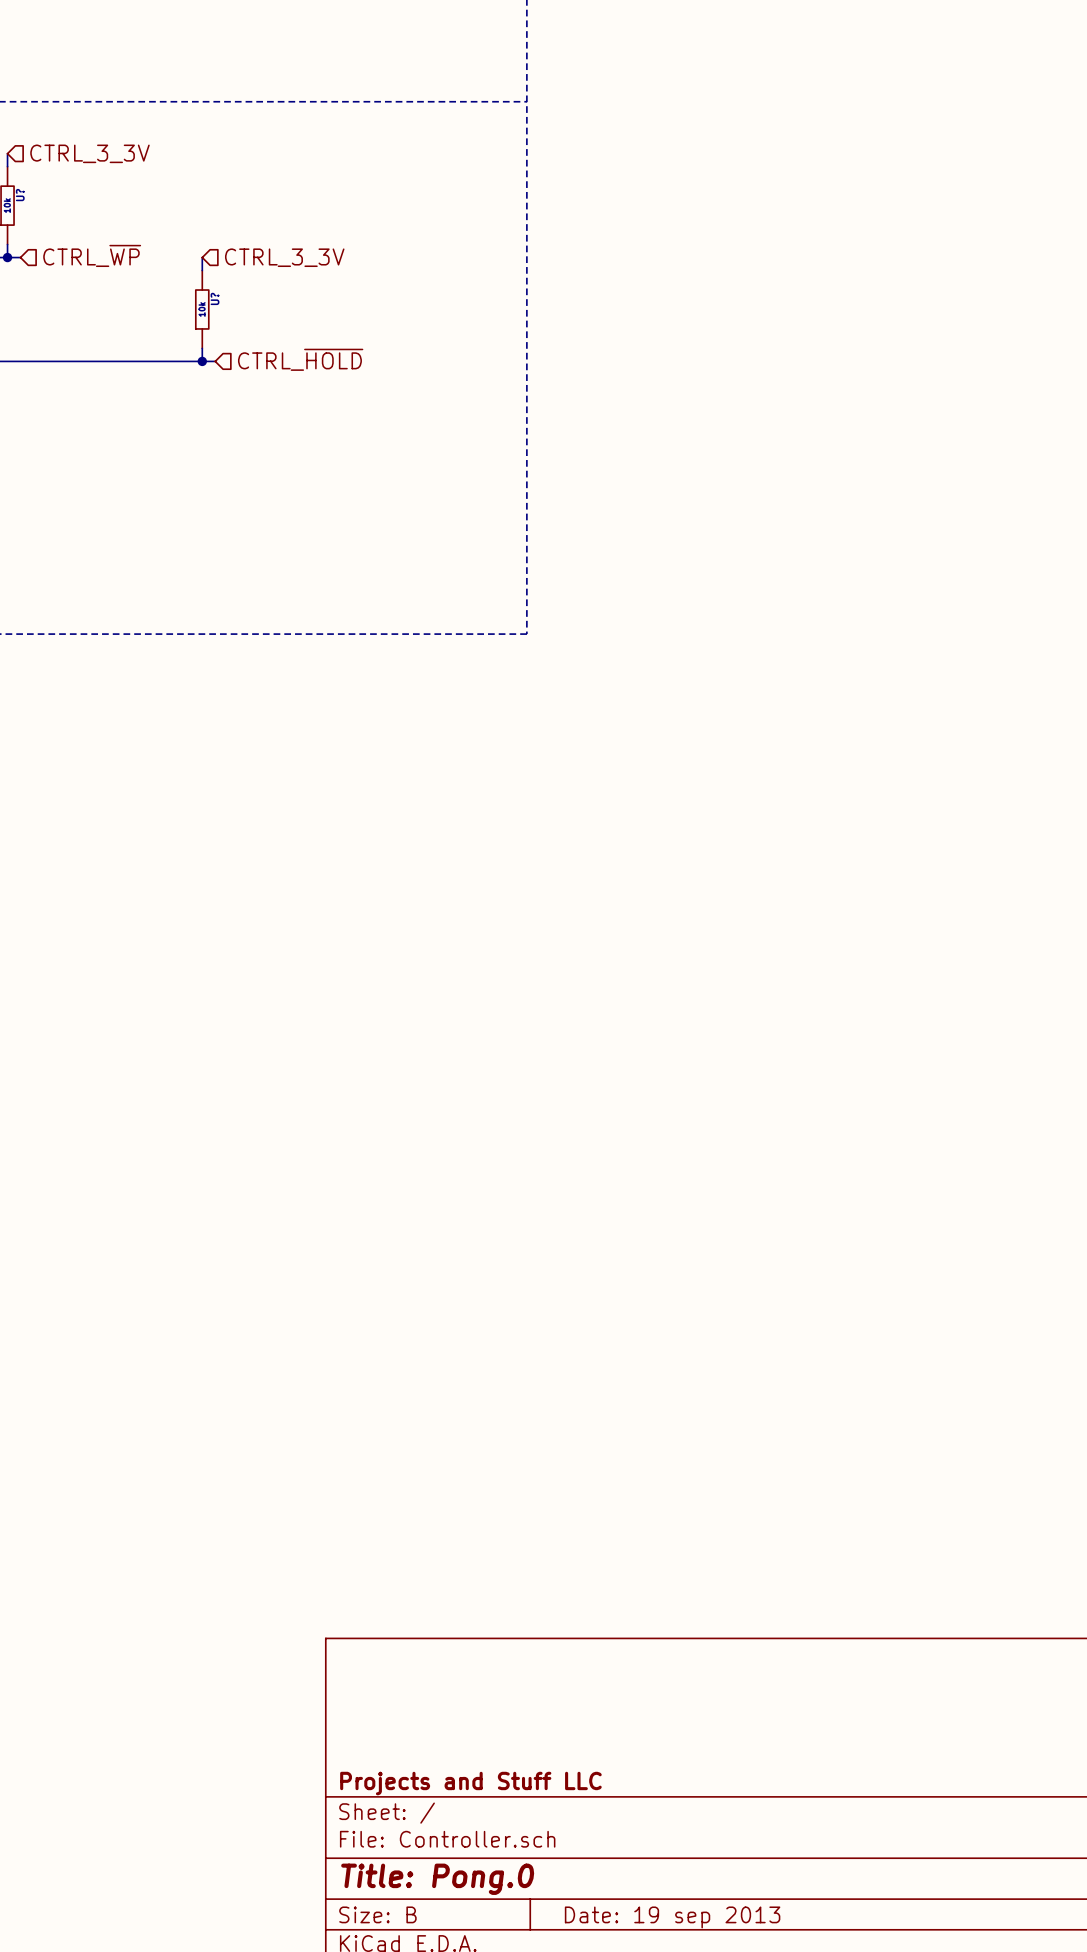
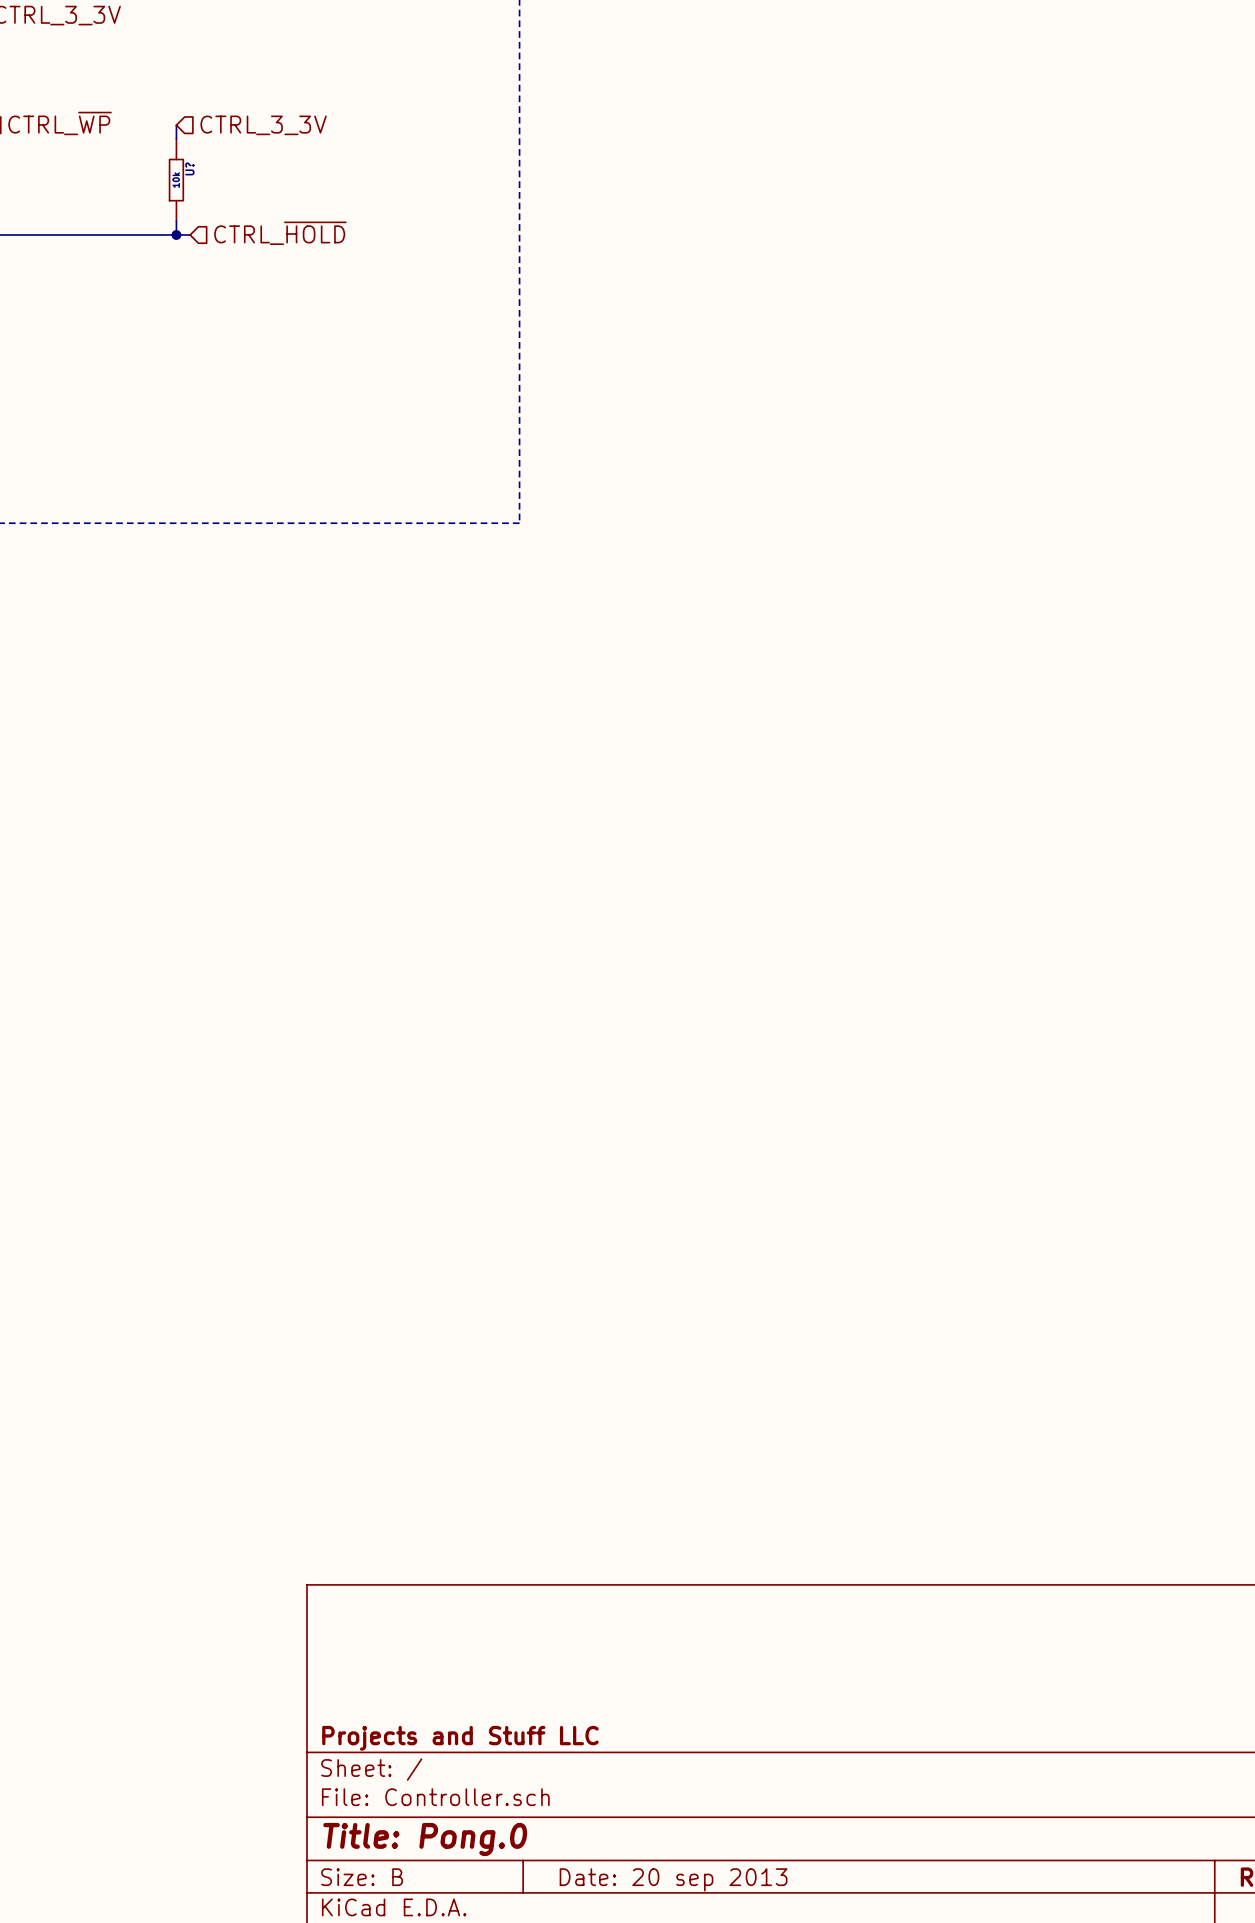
title block: Date: 19 sep 2013 (672, 1917) -> Date: 20 sep 2013 (673, 1879)

